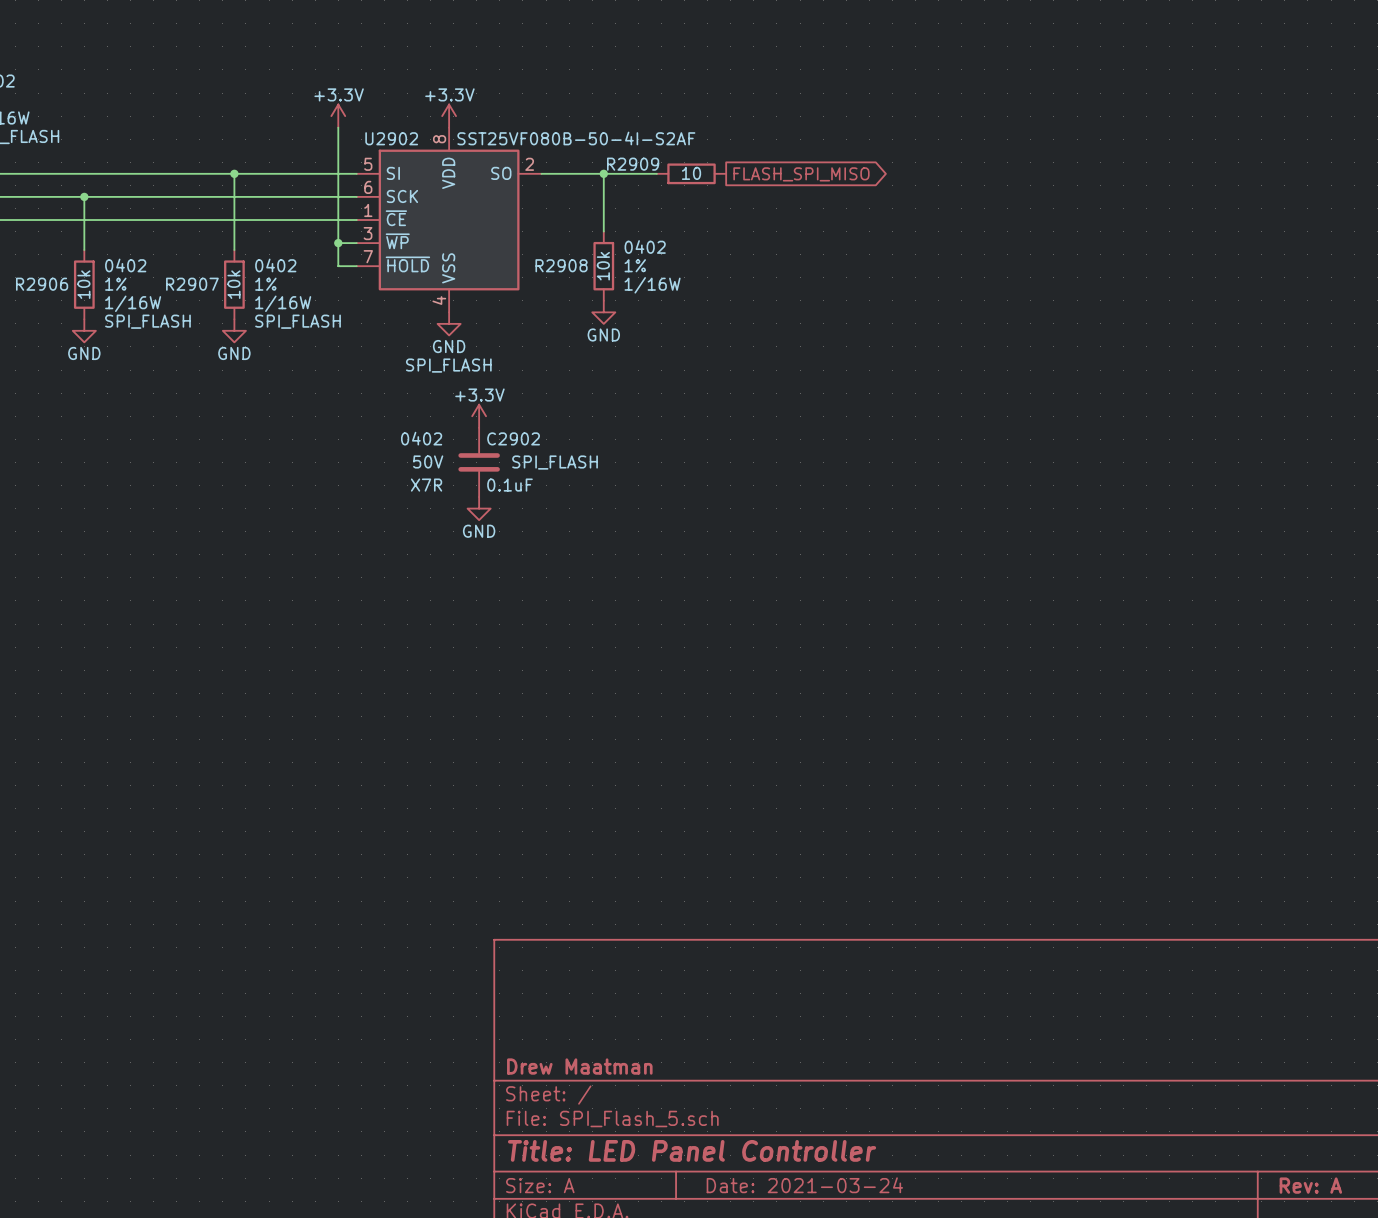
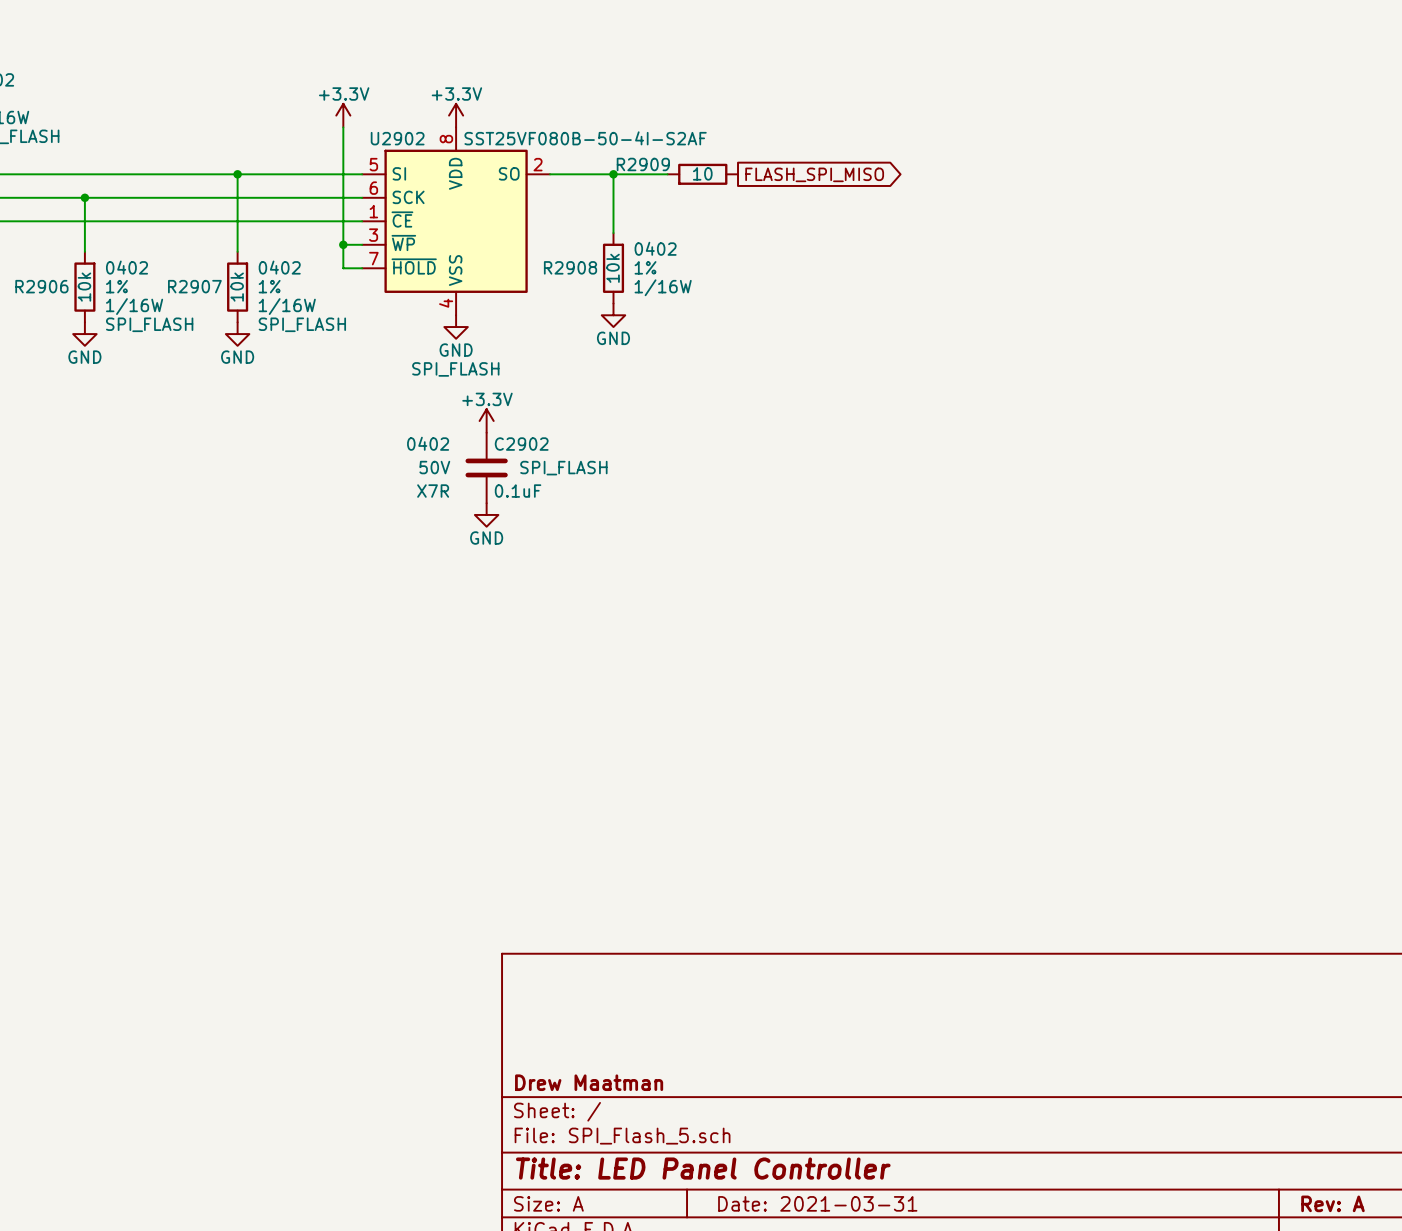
title block: Date: 2021-03-24 (804, 1185) -> Date: 2021-03-31 (817, 1203)

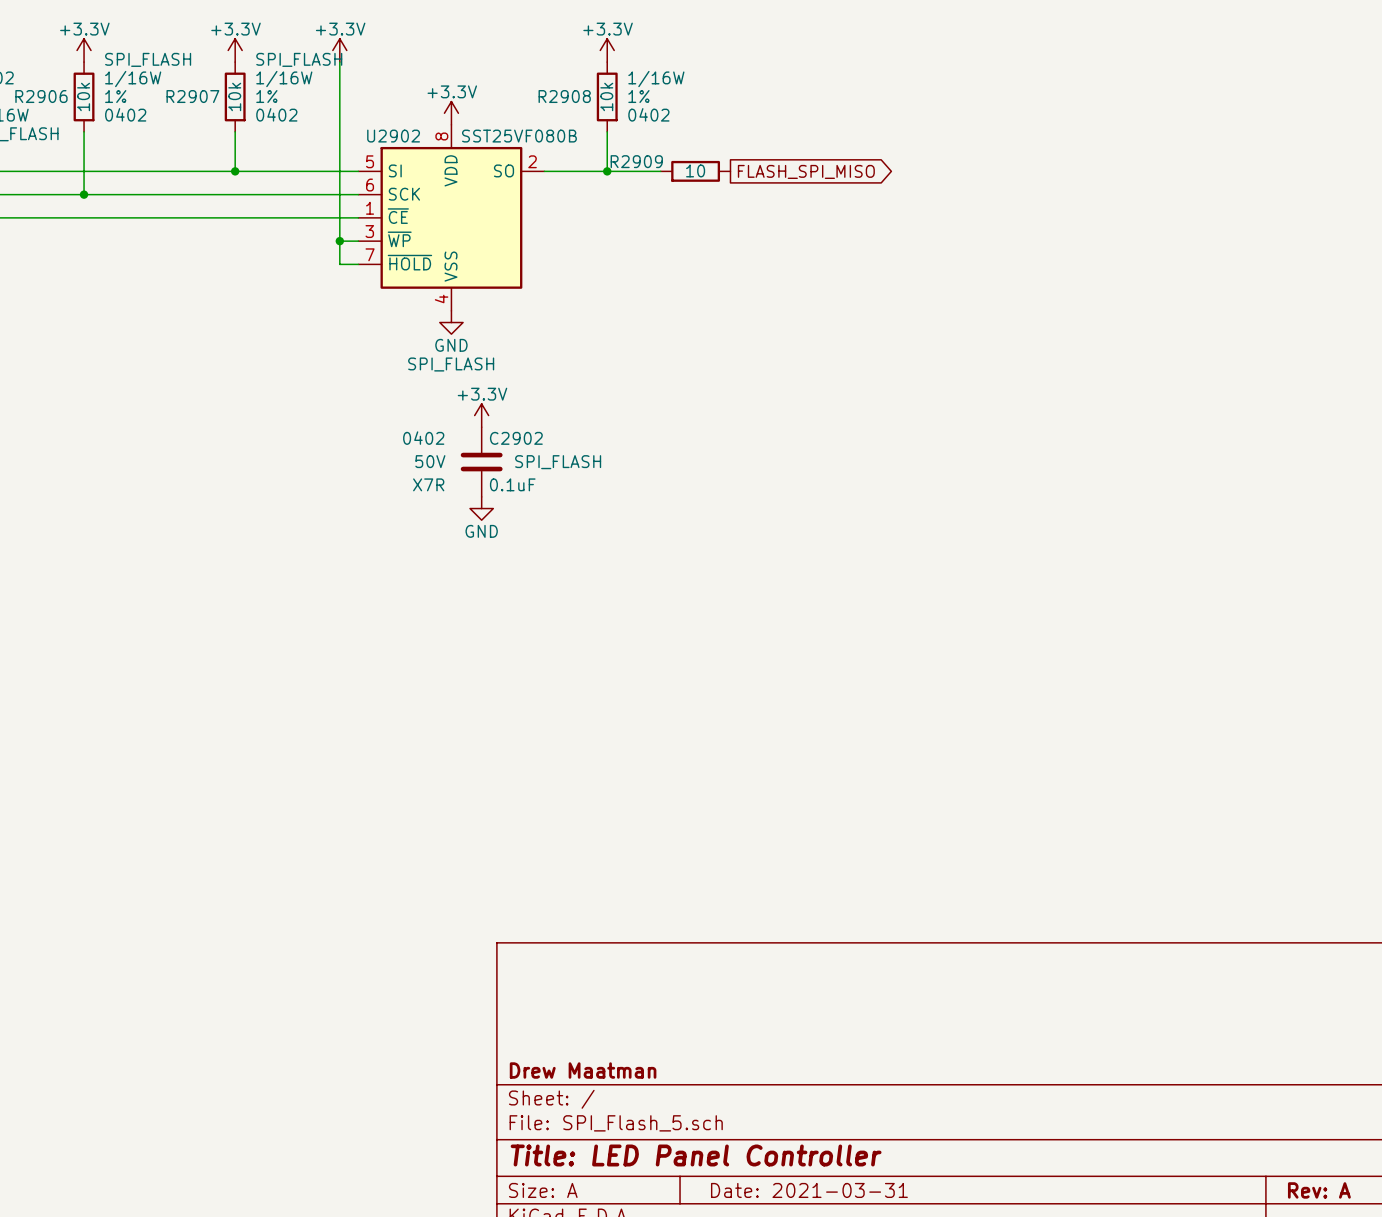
power symbol: none -> +3.3V (84, 50)
power symbol: none -> +3.3V (235, 50)
power symbol: none -> +3.3V (339, 50)
power symbol: none -> +3.3V (607, 50)
wire: none -> (339, 62) (339, 124)
power symbol: +3.3V (343, 115) -> none
U2902 value: SST25VF080B-50-4I-S2AF (585, 138) -> SST25VF080B (519, 136)
wire: (237, 174) (237, 251) -> (235, 171) (235, 131)
wire: (613, 174) (613, 233) -> (607, 171) (607, 131)
wire: (84, 197) (84, 251) -> (84, 194) (84, 131)
R2908 text position: 0402 (655, 248) -> 0402 (648, 114)
R2906 text position: 0402 (127, 267) -> 0402 (125, 114)
R2907 text position: 0402 (279, 267) -> 0402 (276, 114)
R2908 position: (613, 268) -> (607, 96)
R2906 position: (84, 287) -> (84, 96)
R2907 position: (237, 287) -> (235, 96)
R2908 text position: 1/16W (663, 287) -> 1/16W (656, 79)
R2906 text position: 1/16W (134, 306) -> 1/16W (133, 79)
R2907 text position: 1/16W (287, 306) -> 1/16W (284, 79)
power symbol: GND (613, 315) -> none
R2906 text position: SPI_FLASH (149, 324) -> SPI_FLASH (148, 59)
R2907 text position: SPI_FLASH (302, 324) -> SPI_FLASH (299, 59)
power symbol: GND (84, 334) -> none
power symbol: GND (237, 334) -> none

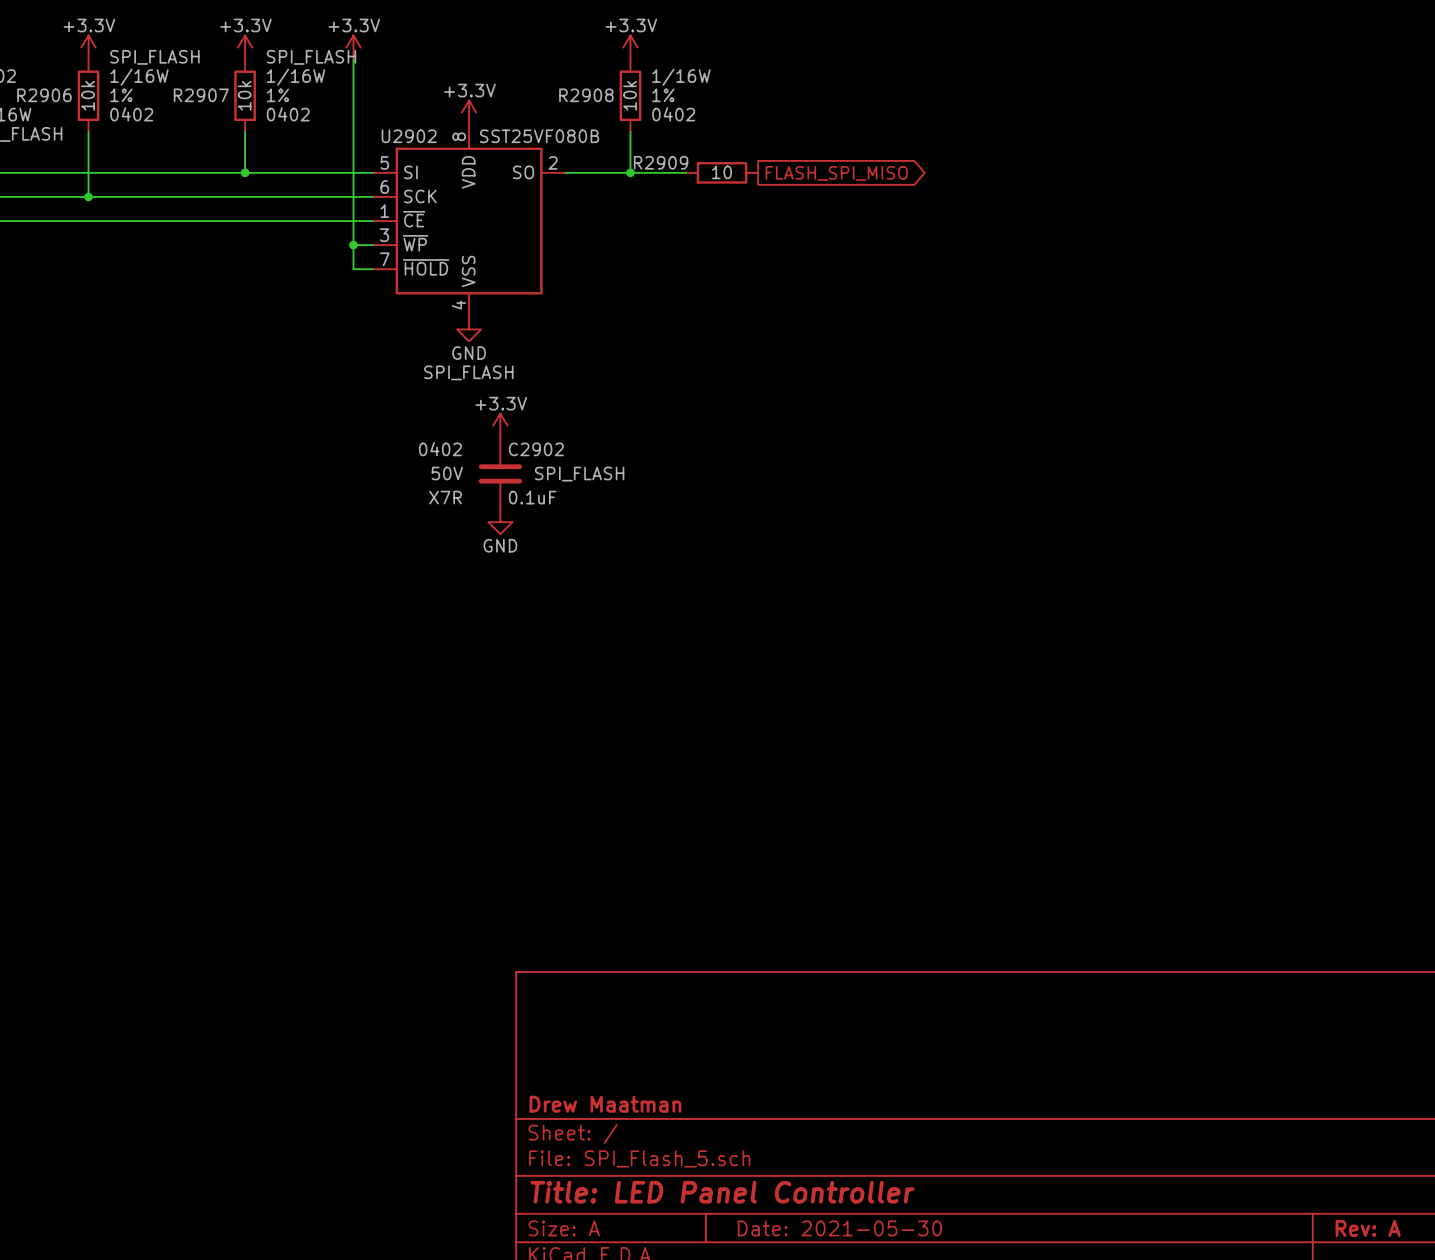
title block: Date: 2021-03-31 (809, 1190) -> Date: 2021-05-30 (839, 1228)

